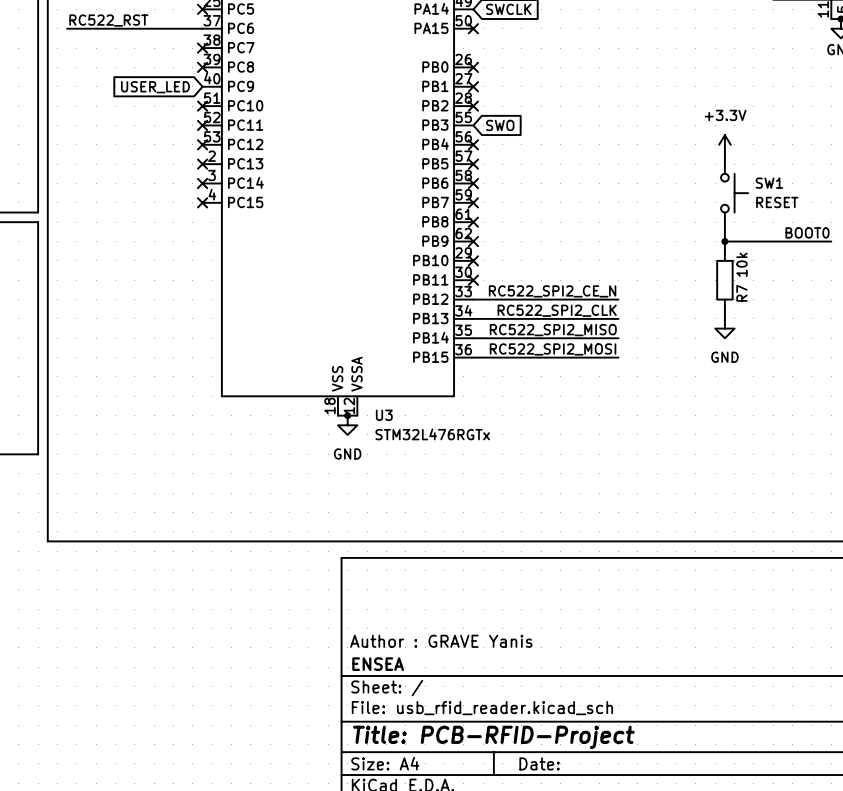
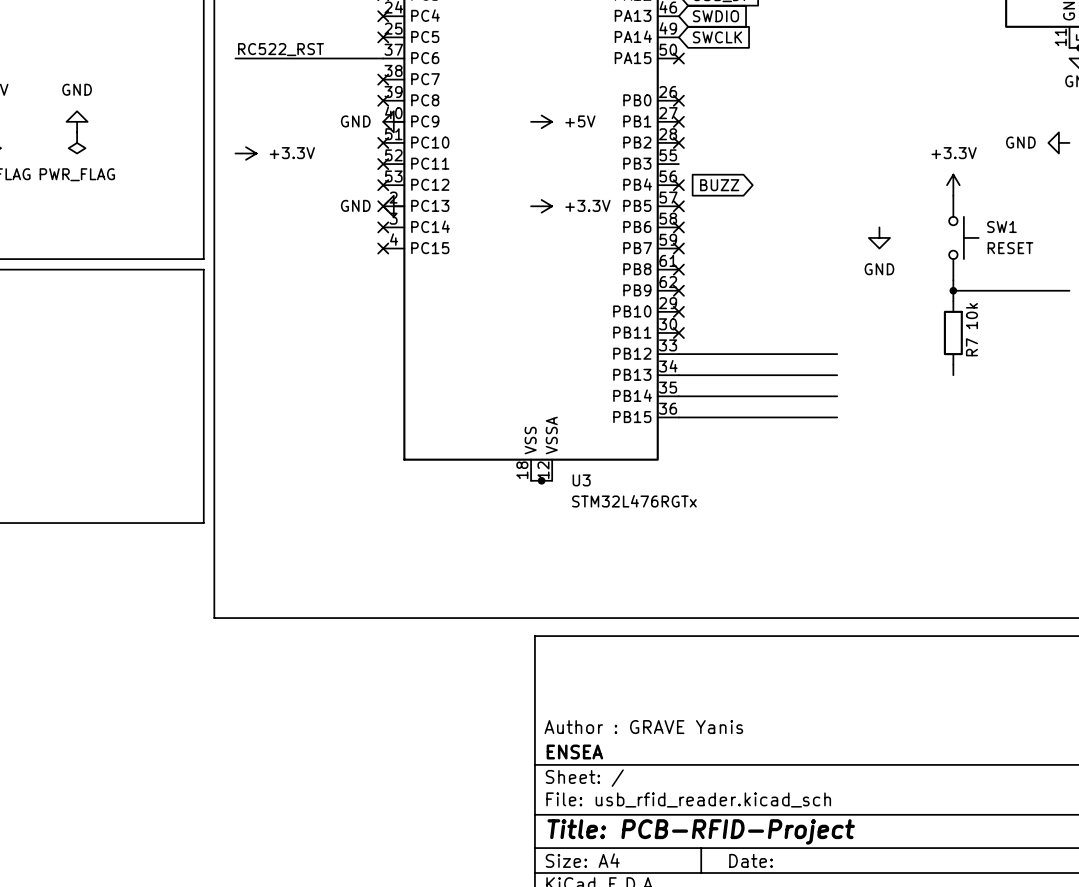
power symbol: none -> GND (393, 121)
power symbol: none -> +5V (541, 121)
global label: USER_LED (155, 87) -> none
power symbol: none -> GND (1058, 142)
power symbol: none -> +3.3V (246, 153)
global label: SWO (500, 125) -> none
global label: none -> BUZZ (719, 185)
power symbol: none -> GND (393, 206)
power symbol: none -> +3.3V (541, 206)
power symbol: none -> GND (879, 237)
label: BOOT0 (807, 232) -> none
label: RC522_SPI2_CE_N (552, 291) -> none
label: RC522_SPI2_CLK (557, 310) -> none
power symbol: GND (724, 328) -> none
label: RC522_SPI2_MISO (553, 330) -> none
label: RC522_SPI2_MOSI (553, 349) -> none
power symbol: GND (347, 425) -> none

